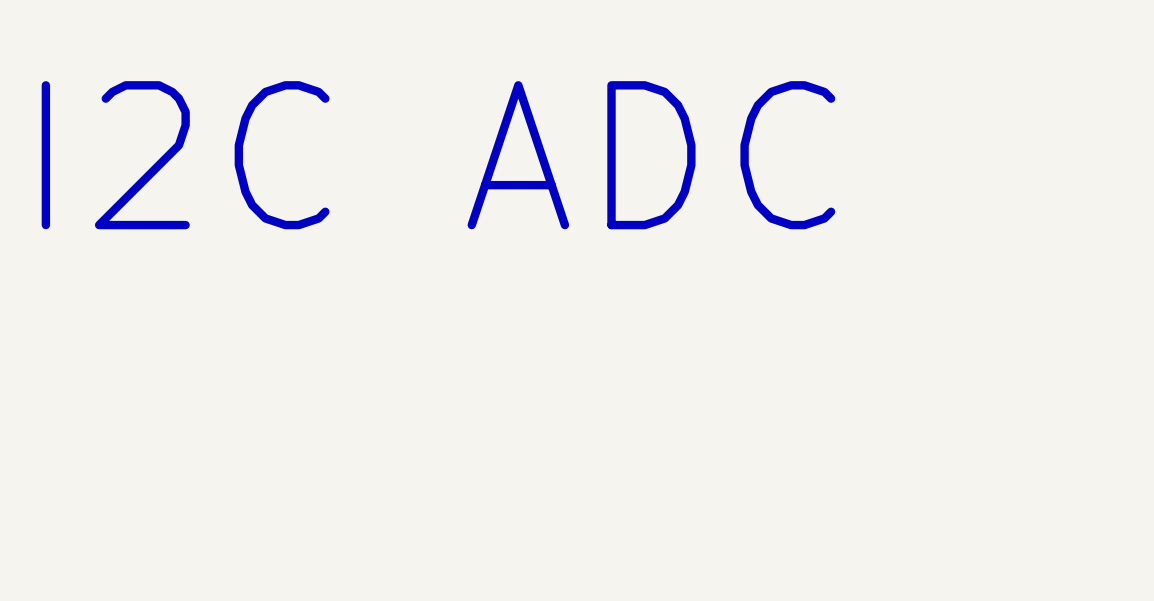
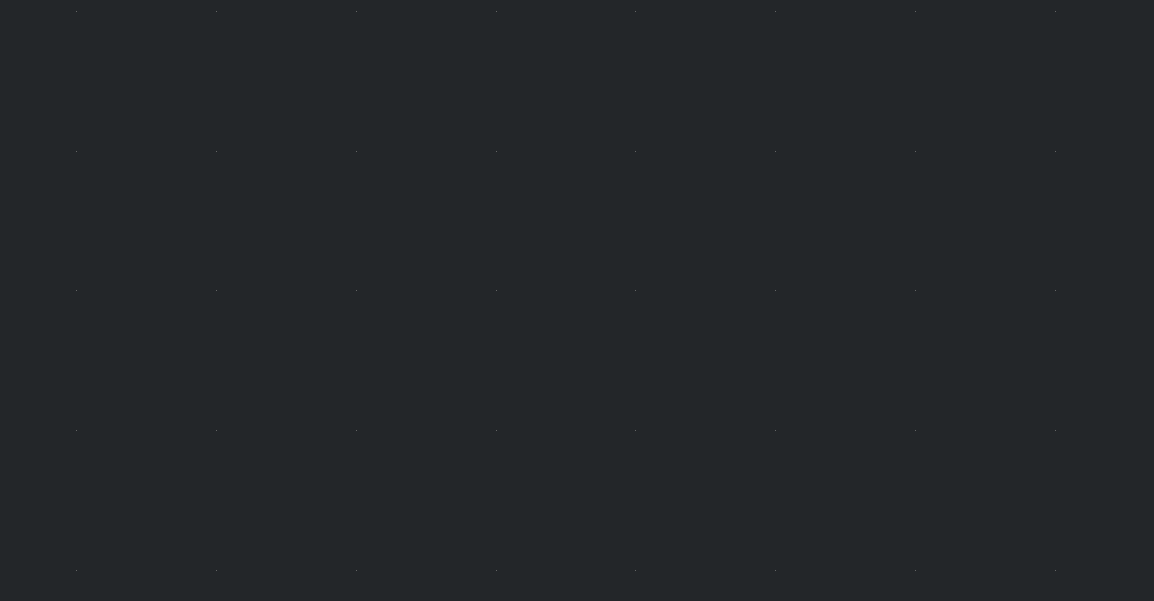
text: I2C ADC (438, 155) -> none

